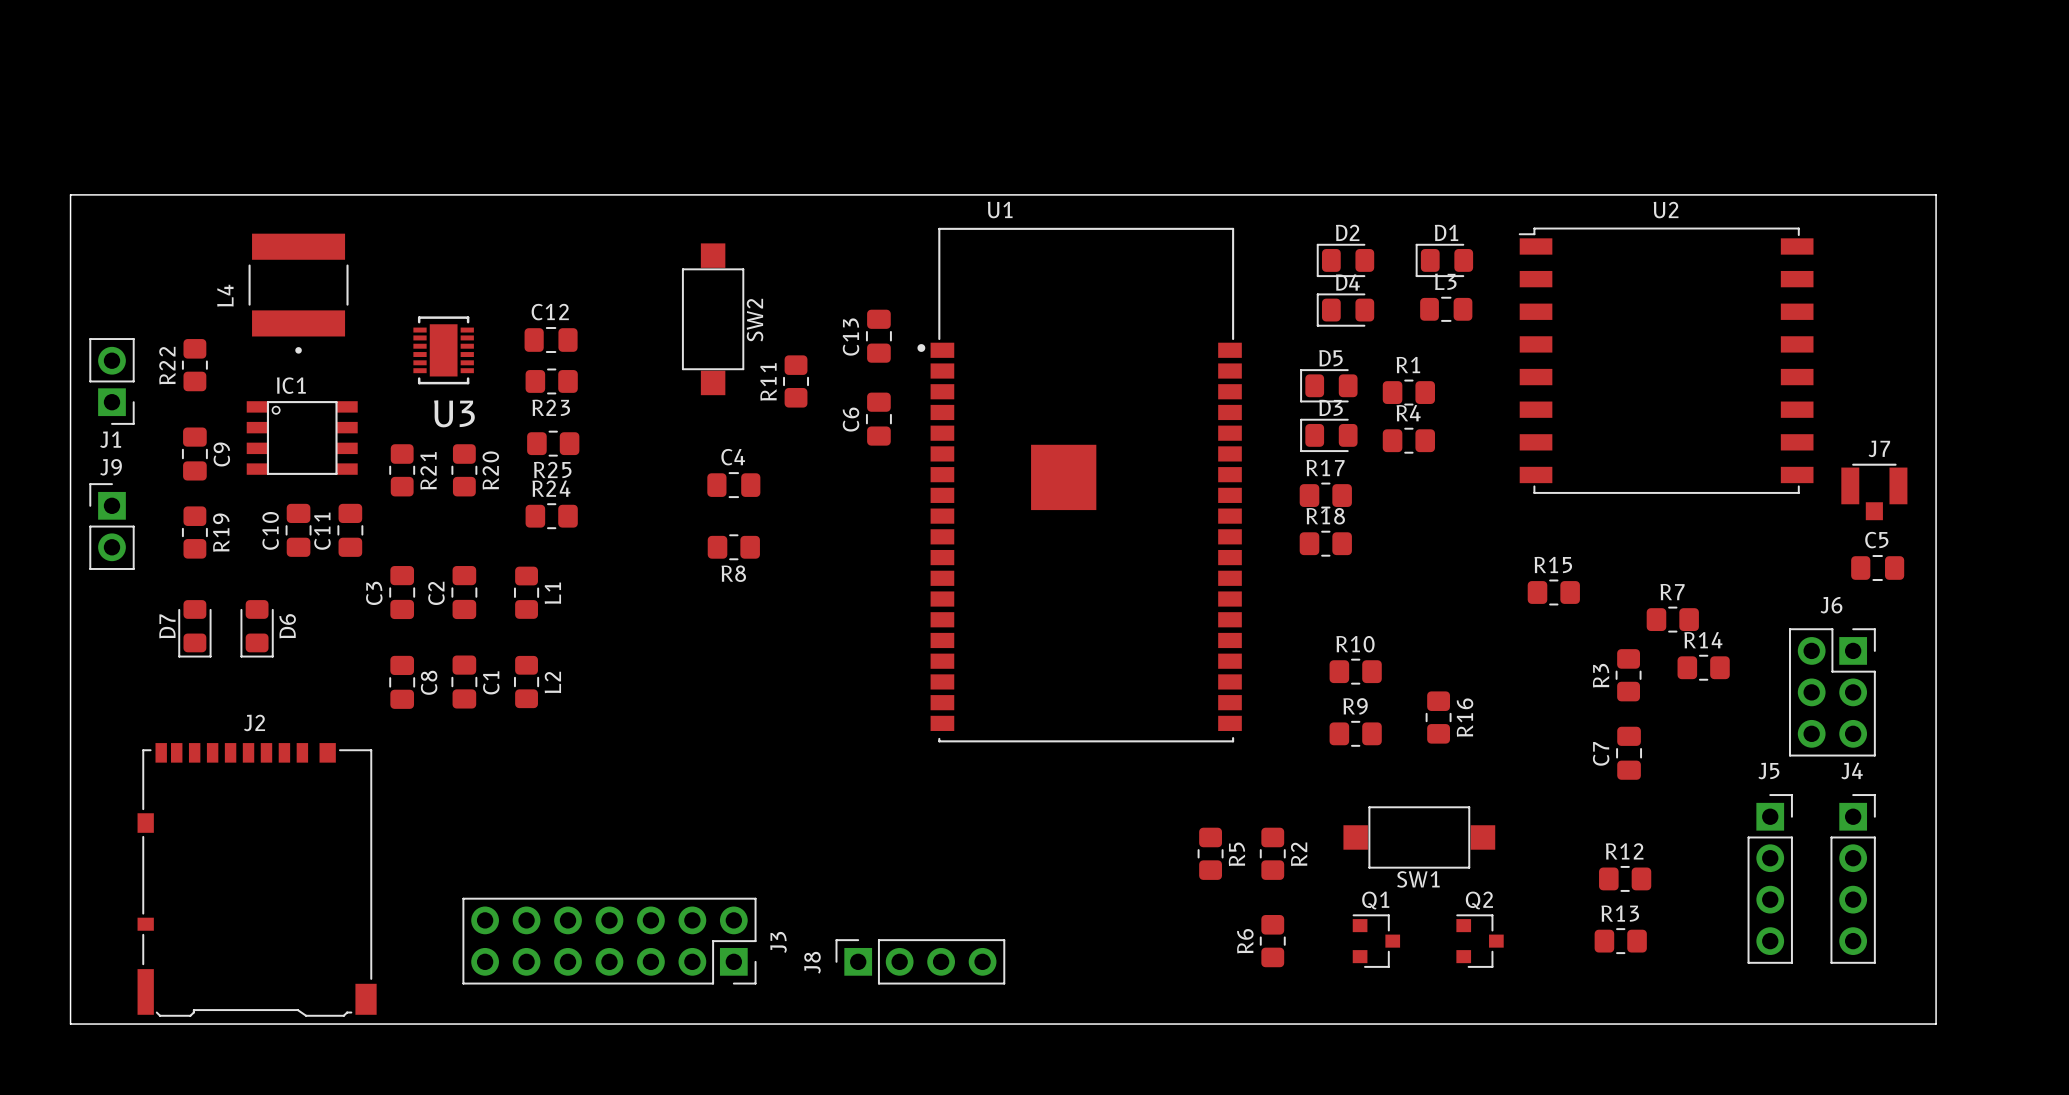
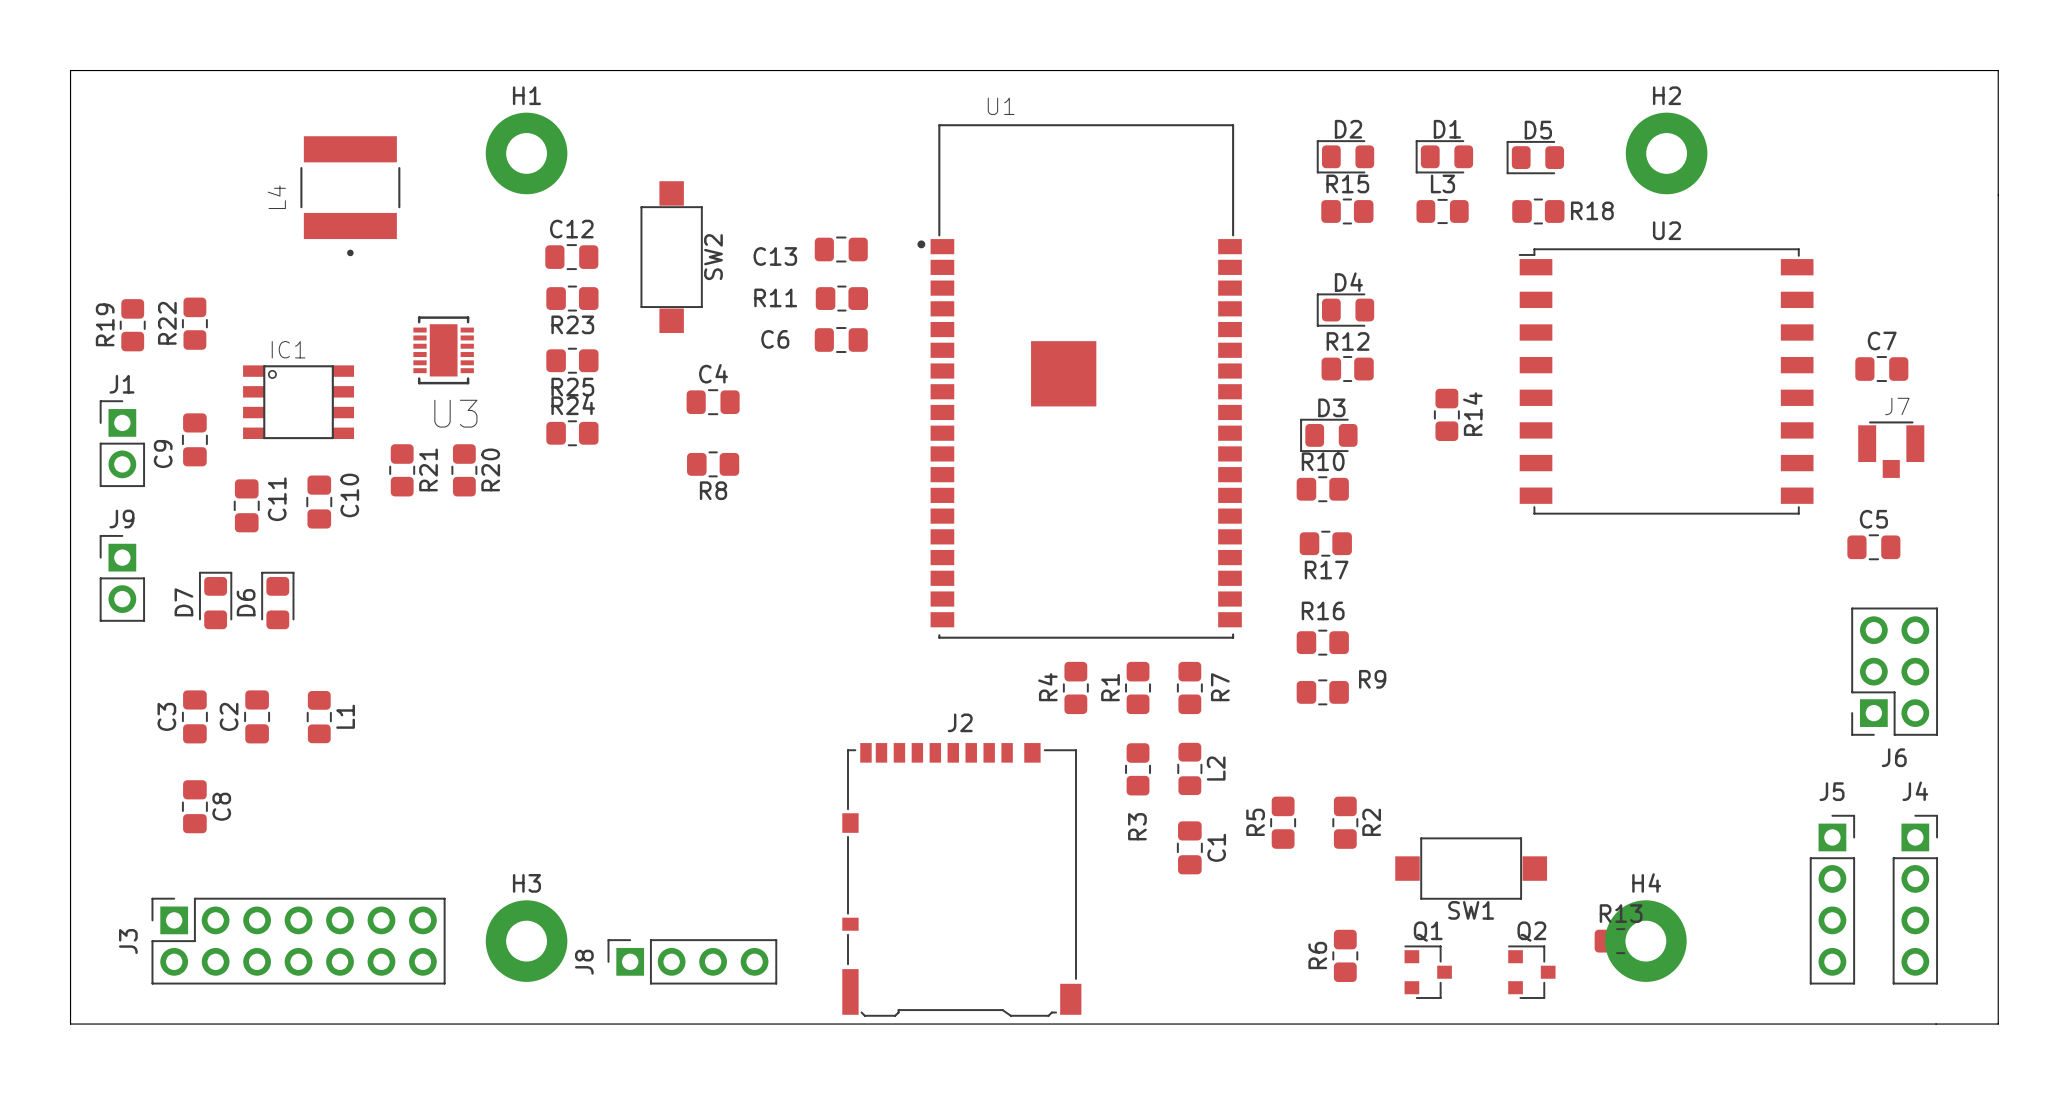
H1: none -> (526, 153)
H2: none -> (1666, 153)
board edge: (70, 194) (1936, 194) (1936, 1024) -> (70, 194) (70, 70) (1998, 70) (1998, 1024) (1936, 1024)
R18: none -> (1538, 211)
D2 position: (1345, 260) -> (1345, 156)
D1 position: (1444, 260) -> (1444, 156)
L4 position: (298, 293) -> (350, 196)
L3 position: (1446, 309) -> (1442, 211)
SW2 position: (713, 319) -> (671, 257)
C13 rotation: 0° (878, 336) -> 90° clockwise (841, 249)
C13 position: (878, 336) -> (841, 249)
C13 name position: C13 (850, 337) -> C13 (775, 256)
C12 position: (551, 340) -> (571, 257)
U2 position: (1666, 360) -> (1666, 381)
R22 position: (194, 365) -> (194, 323)
R1 name position: R1 (1408, 365) -> R1 (1110, 687)
J1 rotation: 0° (111, 381) -> 180° (122, 443)
J1 position: (111, 381) -> (122, 443)
R23 position: (551, 381) -> (572, 298)
R11 name position: R11 (768, 381) -> R11 (775, 297)
R11 rotation: 0° (796, 381) -> 90° clockwise (841, 298)
R11 position: (796, 381) -> (841, 298)
D5 position: (1328, 385) -> (1535, 157)
R1 rotation: 0° (1408, 392) -> 90° clockwise (1138, 687)
R1 position: (1408, 392) -> (1138, 687)
R4 name position: R4 (1408, 413) -> R4 (1047, 687)
C6 name position: C6 (851, 419) -> C6 (775, 339)
C6 rotation: 0° (878, 419) -> 90° clockwise (841, 340)
C6 position: (878, 419) -> (841, 340)
IC1 position: (302, 437) -> (298, 402)
R4 rotation: 0° (1408, 440) -> 90° clockwise (1075, 687)
R4 position: (1408, 440) -> (1075, 687)
R25 position: (553, 443) -> (572, 360)
C9 position: (194, 454) -> (194, 439)
C9 name position: C9 (221, 454) -> C9 (163, 454)
C4 position: (733, 485) -> (713, 402)
U1 position: (1079, 485) -> (1079, 381)
J7 position: (1874, 491) -> (1891, 449)
R17: (1325, 495) -> none
R24 position: (551, 516) -> (572, 433)
R18 name: R18 (1325, 516) -> R17 (1326, 570)
J9 position: (111, 526) -> (122, 578)
C10 name position: C10 (270, 530) -> C10 (349, 495)
C10 position: (298, 530) -> (319, 502)
C11 position: (350, 530) -> (246, 505)
C11 name position: C11 (322, 531) -> C11 (277, 499)
R19 position: (194, 532) -> (132, 325)
R19 name position: R19 (221, 532) -> R19 (105, 324)
R8 position: (733, 547) -> (713, 464)
C5 position: (1877, 568) -> (1873, 547)
C3 position: (402, 592) -> (194, 716)
C2 position: (464, 592) -> (257, 716)
L1 position: (526, 592) -> (319, 717)
R15 position: (1553, 592) -> (1347, 211)
R7 rotation: 0° (1672, 619) -> 90° clockwise (1189, 687)
R7 position: (1672, 619) -> (1189, 687)
D7 rotation: 0° (194, 628) -> 180° (215, 600)
D7 position: (194, 628) -> (215, 600)
D6 rotation: 0° (257, 628) -> 180° (277, 600)
D6 position: (257, 628) -> (277, 600)
R14 rotation: 0° (1703, 667) -> 90° clockwise (1446, 414)
R14 position: (1703, 667) -> (1446, 414)
R10 position: (1355, 671) -> (1322, 489)
R3 name position: R3 (1601, 675) -> R3 (1137, 826)
R3 position: (1628, 675) -> (1138, 769)
C8 position: (402, 682) -> (194, 806)
C1 position: (464, 682) -> (1189, 847)
L2 position: (526, 682) -> (1189, 768)
J6 rotation: 0° (1832, 692) -> 180° (1894, 671)
R9 name position: R9 (1355, 706) -> R9 (1372, 679)
R16 rotation: 0° (1438, 717) -> 90° clockwise (1322, 642)
R16 position: (1438, 717) -> (1322, 642)
R16 name position: R16 (1465, 717) -> R16 (1323, 610)
R9 position: (1355, 733) -> (1322, 692)
C7 rotation: 0° (1629, 753) -> 90° clockwise (1881, 369)
C7 position: (1629, 753) -> (1881, 369)
SW1 position: (1419, 837) -> (1471, 868)
R5 position: (1210, 853) -> (1283, 822)
R2 position: (1272, 853) -> (1345, 822)
R5 name position: R5 (1236, 854) -> R5 (1255, 822)
R12 position: (1625, 878) -> (1347, 369)
J5 position: (1770, 878) -> (1832, 899)
J4 position: (1853, 878) -> (1915, 899)
J2 position: (257, 879) -> (961, 879)
H3: none -> (526, 941)
J3 rotation: 0° (609, 941) -> 180° (298, 941)
J3 position: (609, 941) -> (298, 941)
R6 position: (1272, 941) -> (1345, 955)
Q1 position: (1376, 941) -> (1428, 972)
Q2 position: (1479, 941) -> (1531, 972)
H4: none -> (1645, 941)
J8 position: (920, 961) -> (692, 961)

